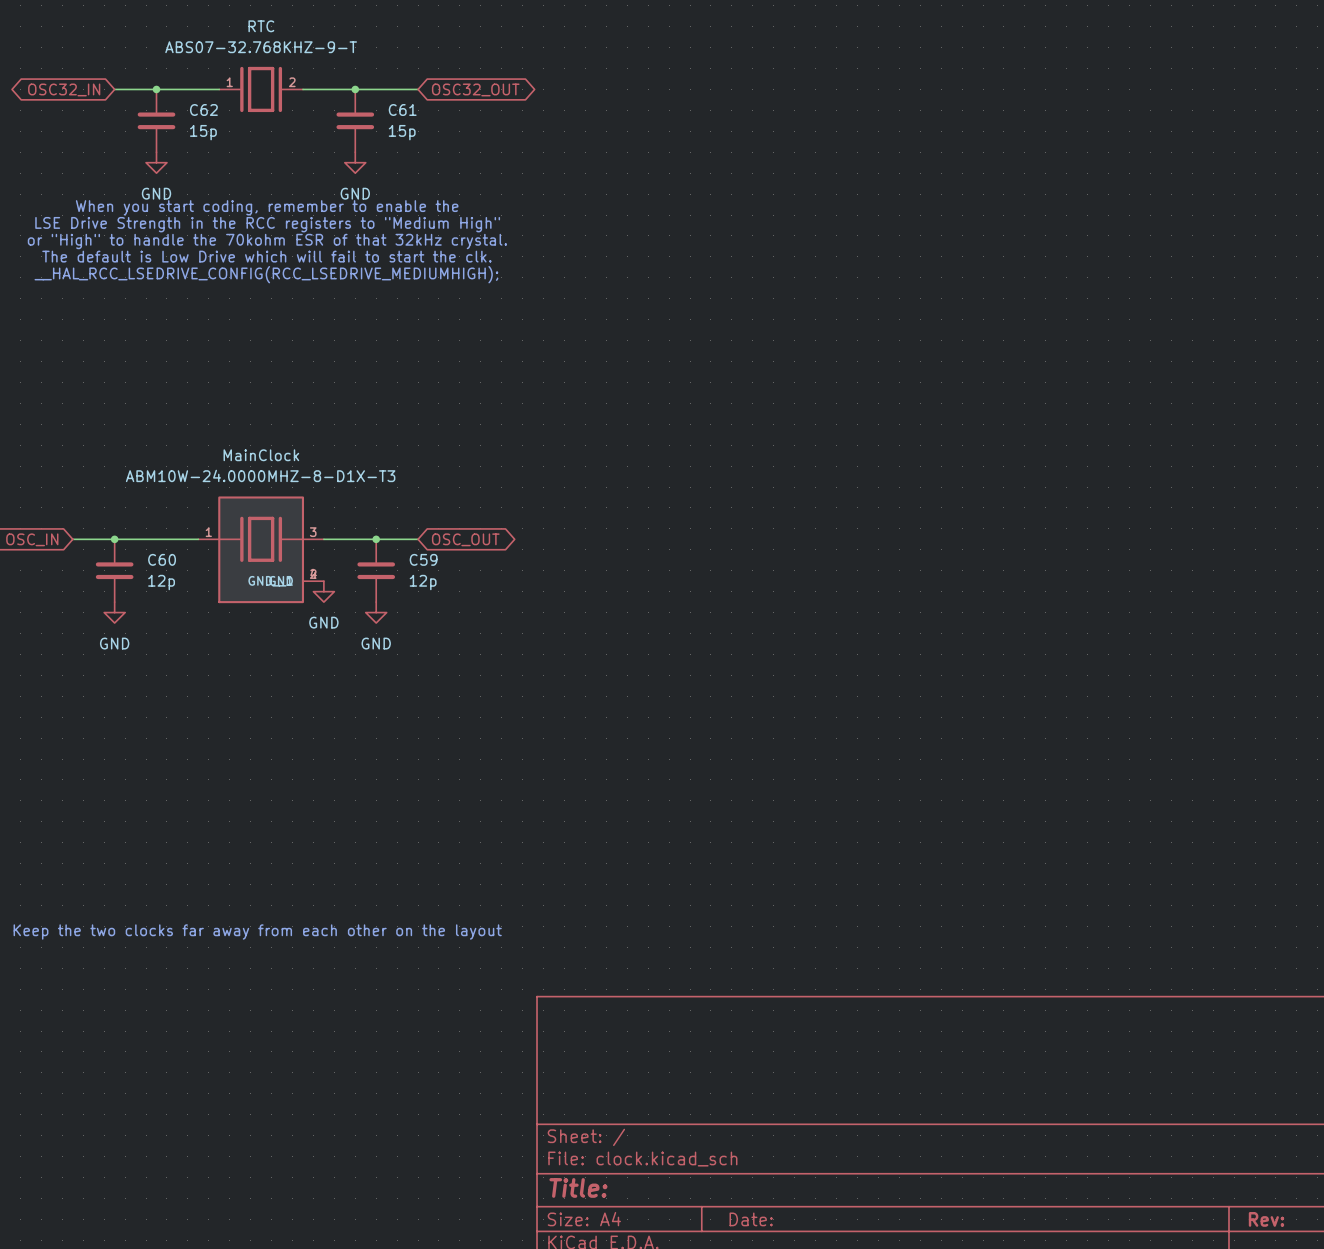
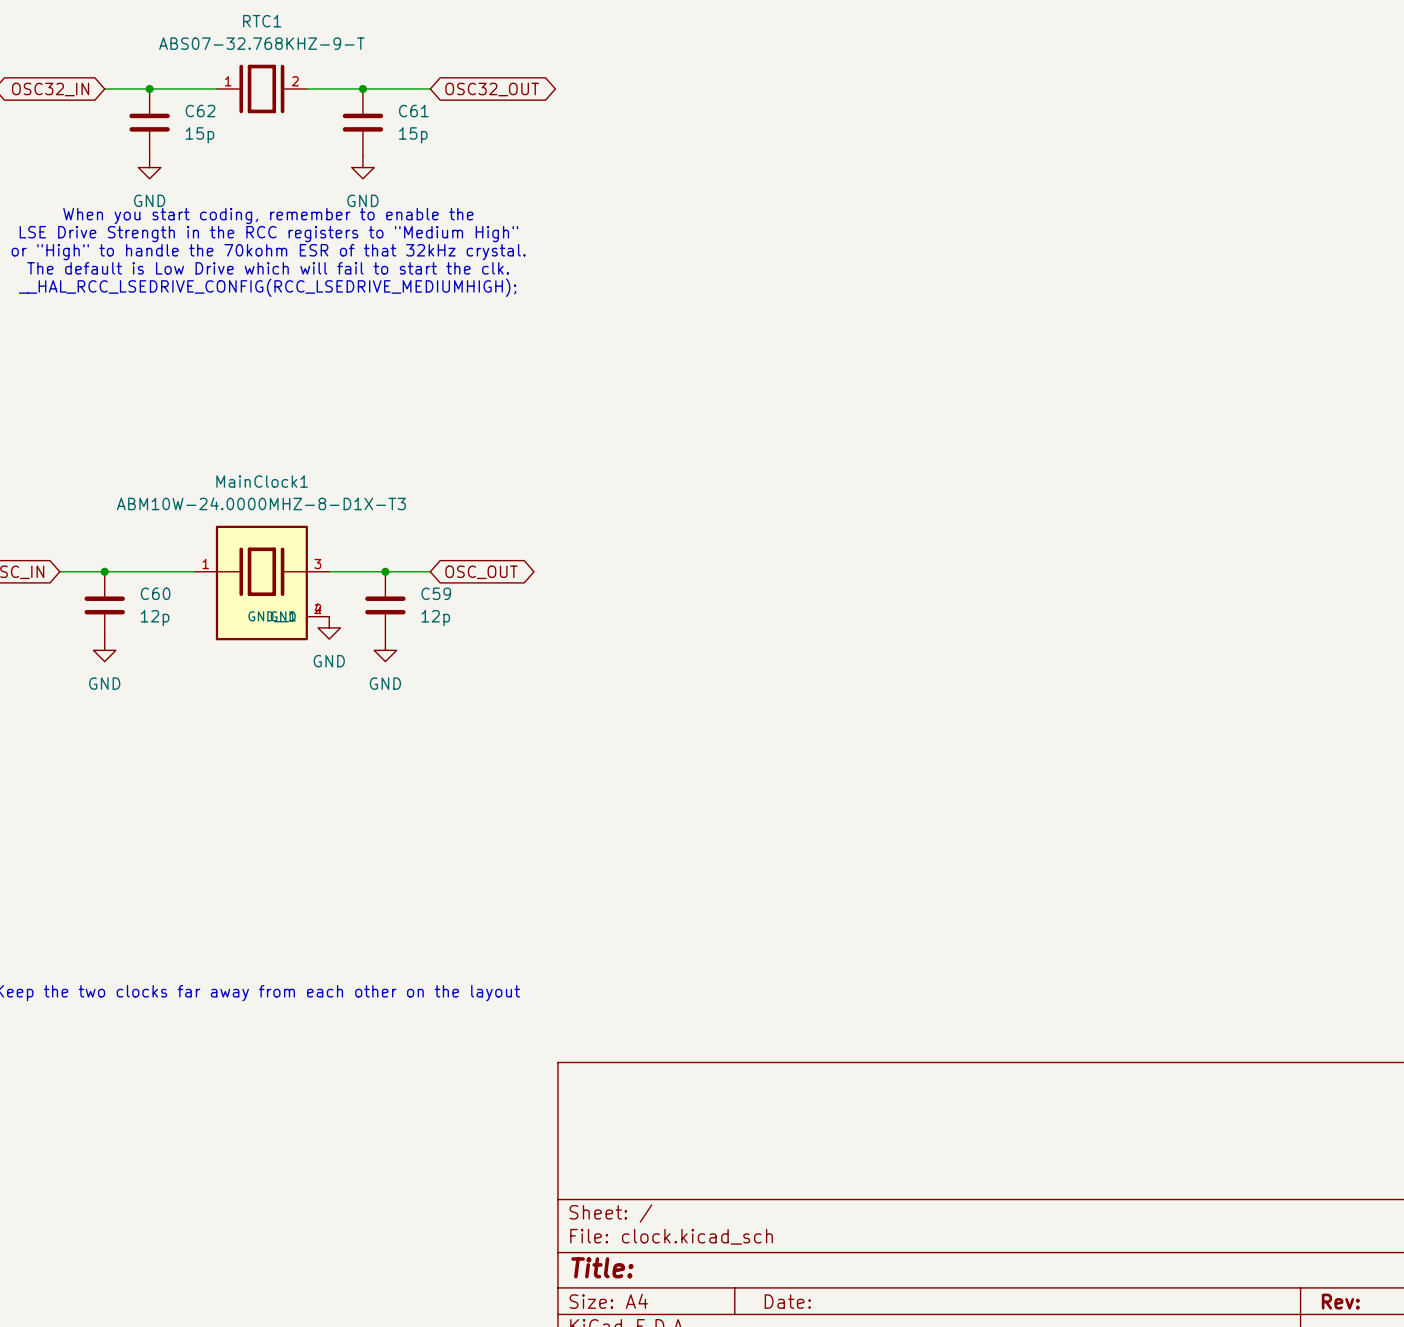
RTC name: RTC (261, 26) -> RTC1 (262, 21)
MainClock name: MainClock (261, 455) -> MainClock1 (262, 481)

